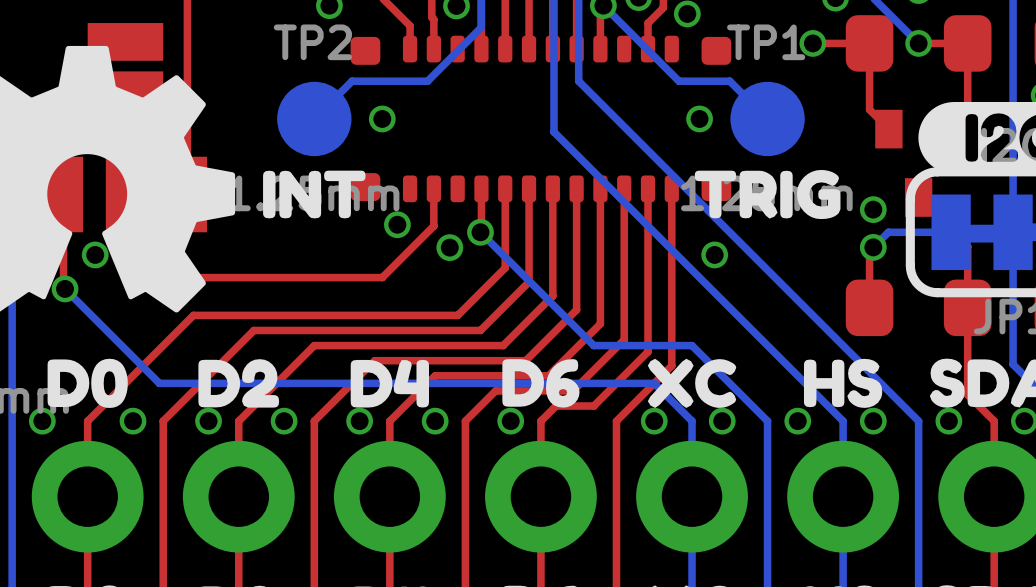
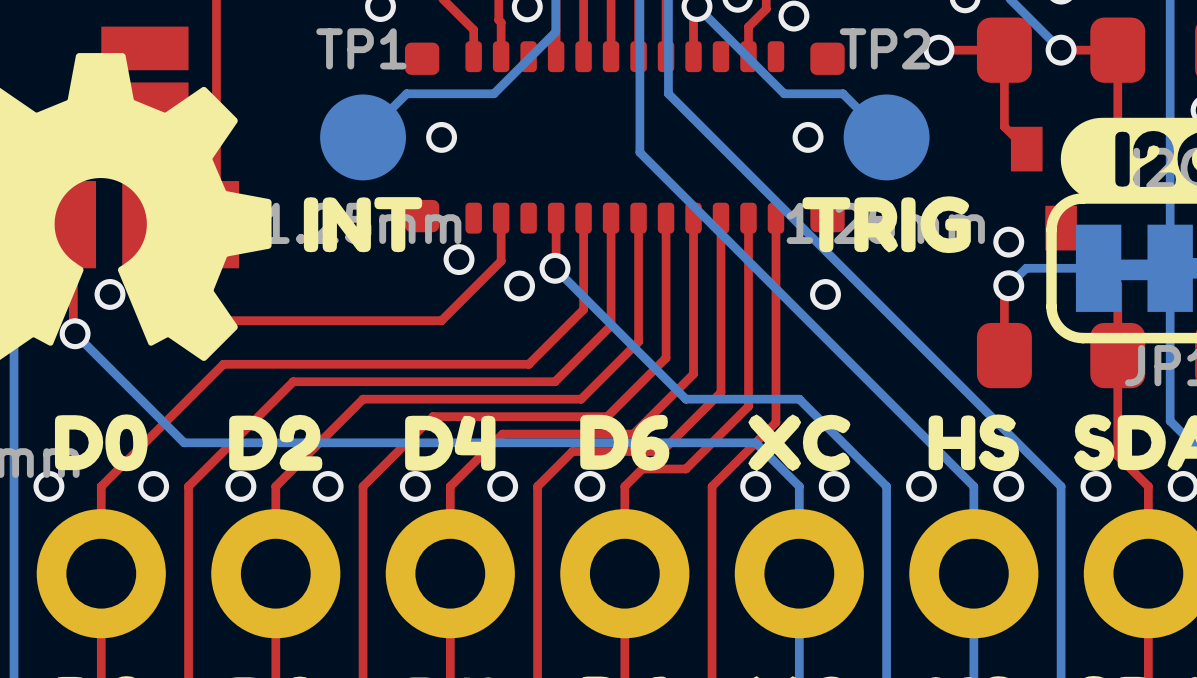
TP2 name: TP2 (312, 42) -> TP1 (361, 48)
TP1 name: TP1 (766, 42) -> TP2 (884, 48)

